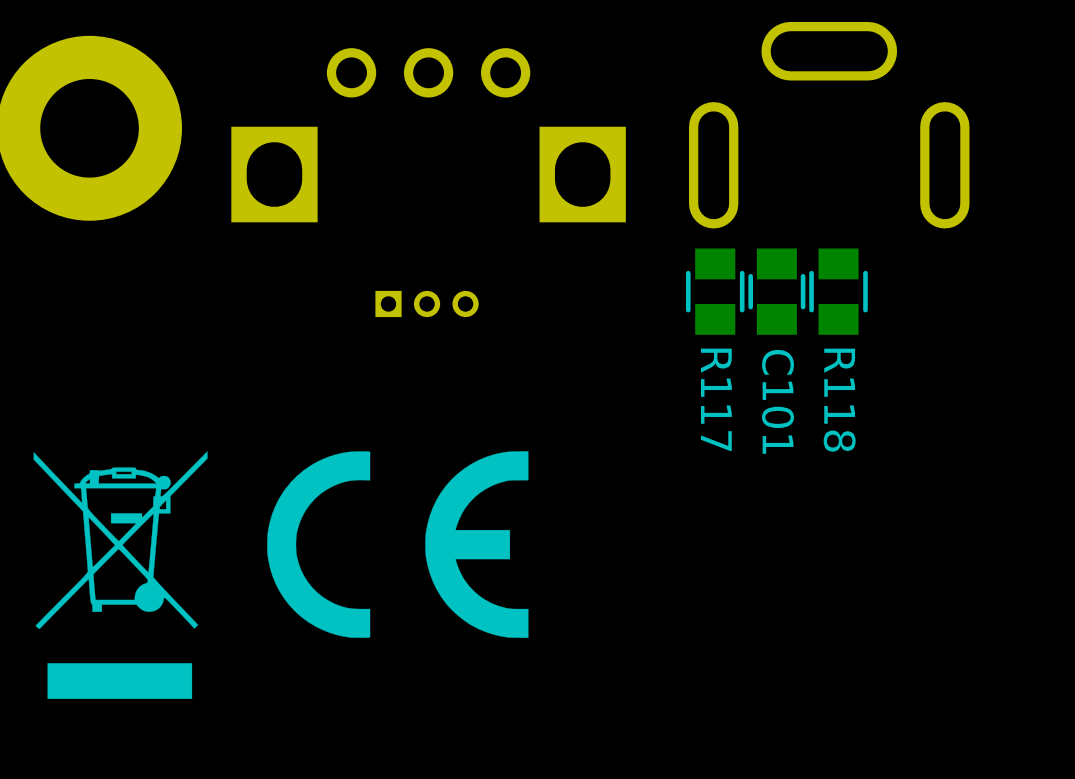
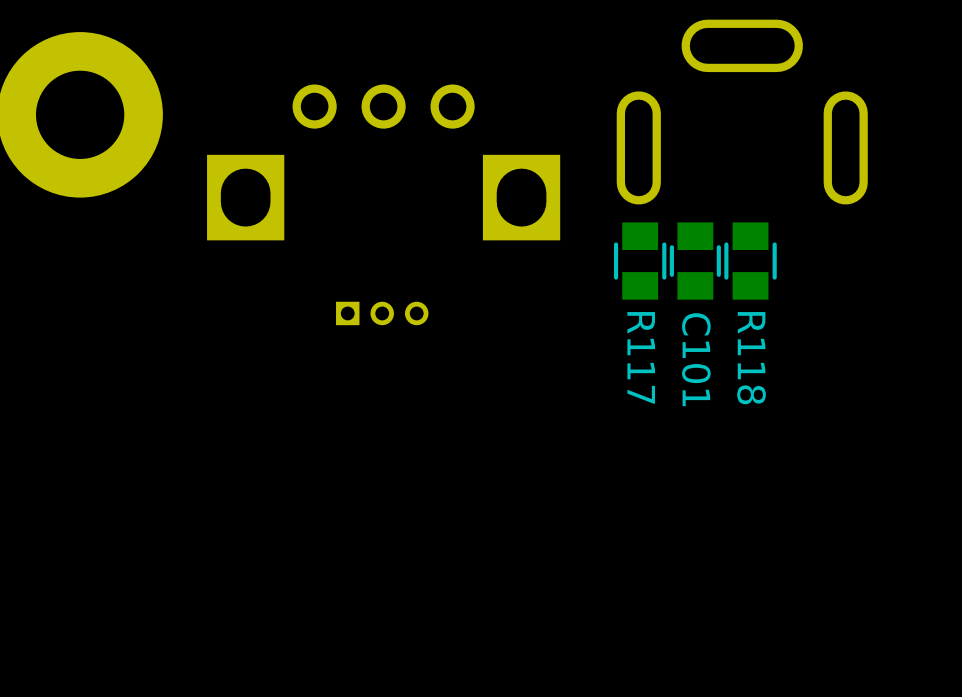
part position: (428, 135) -> (383, 162)
part position: (427, 303) -> (382, 313)
drawing: [33, 451, 208, 699] -> none
drawing: [267, 451, 529, 638] -> none

